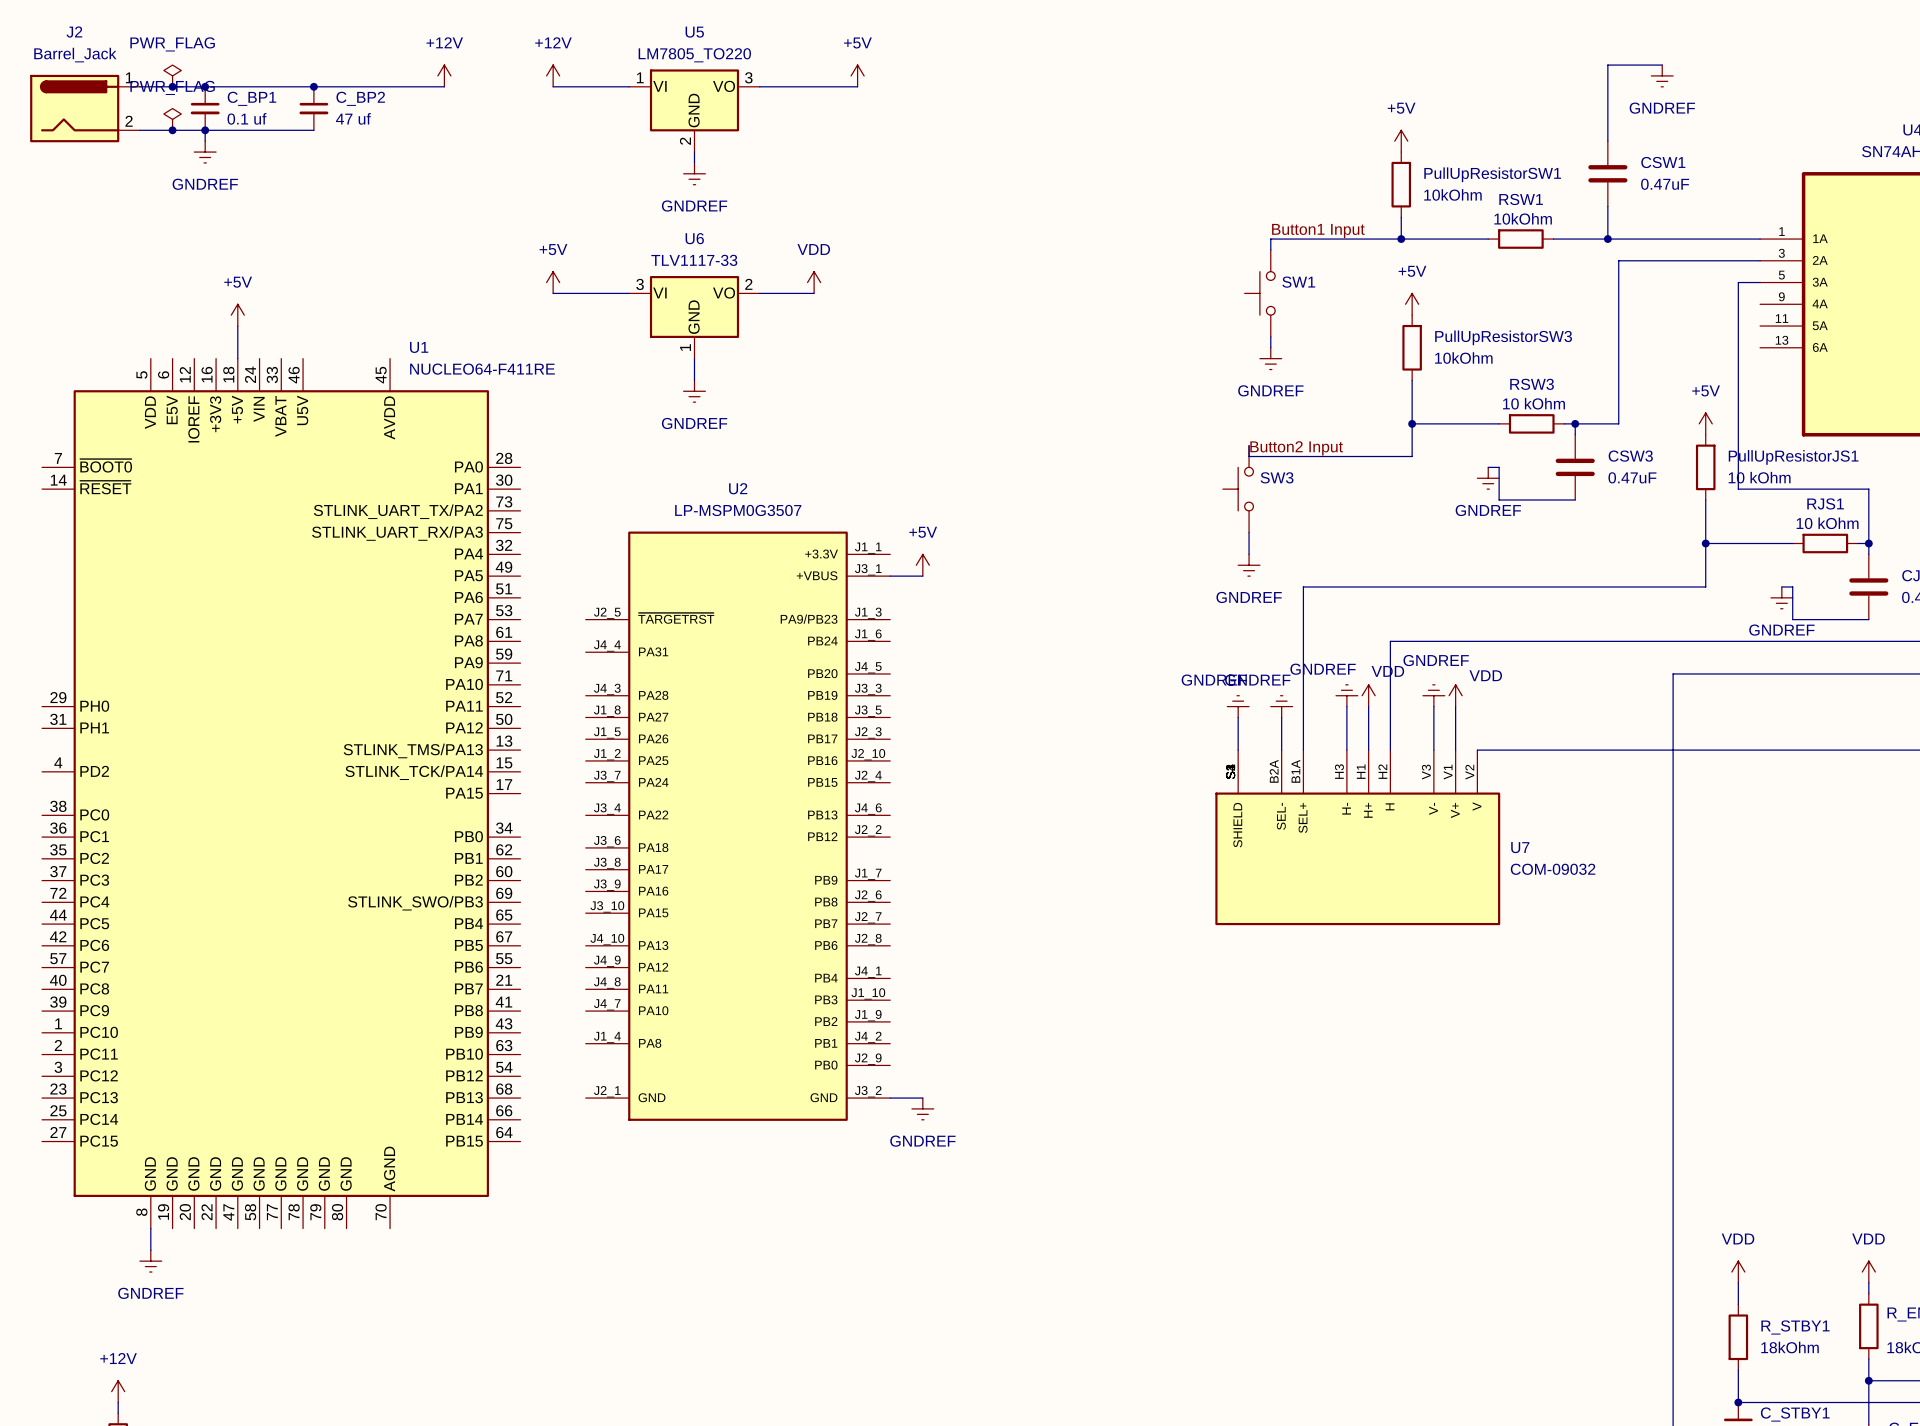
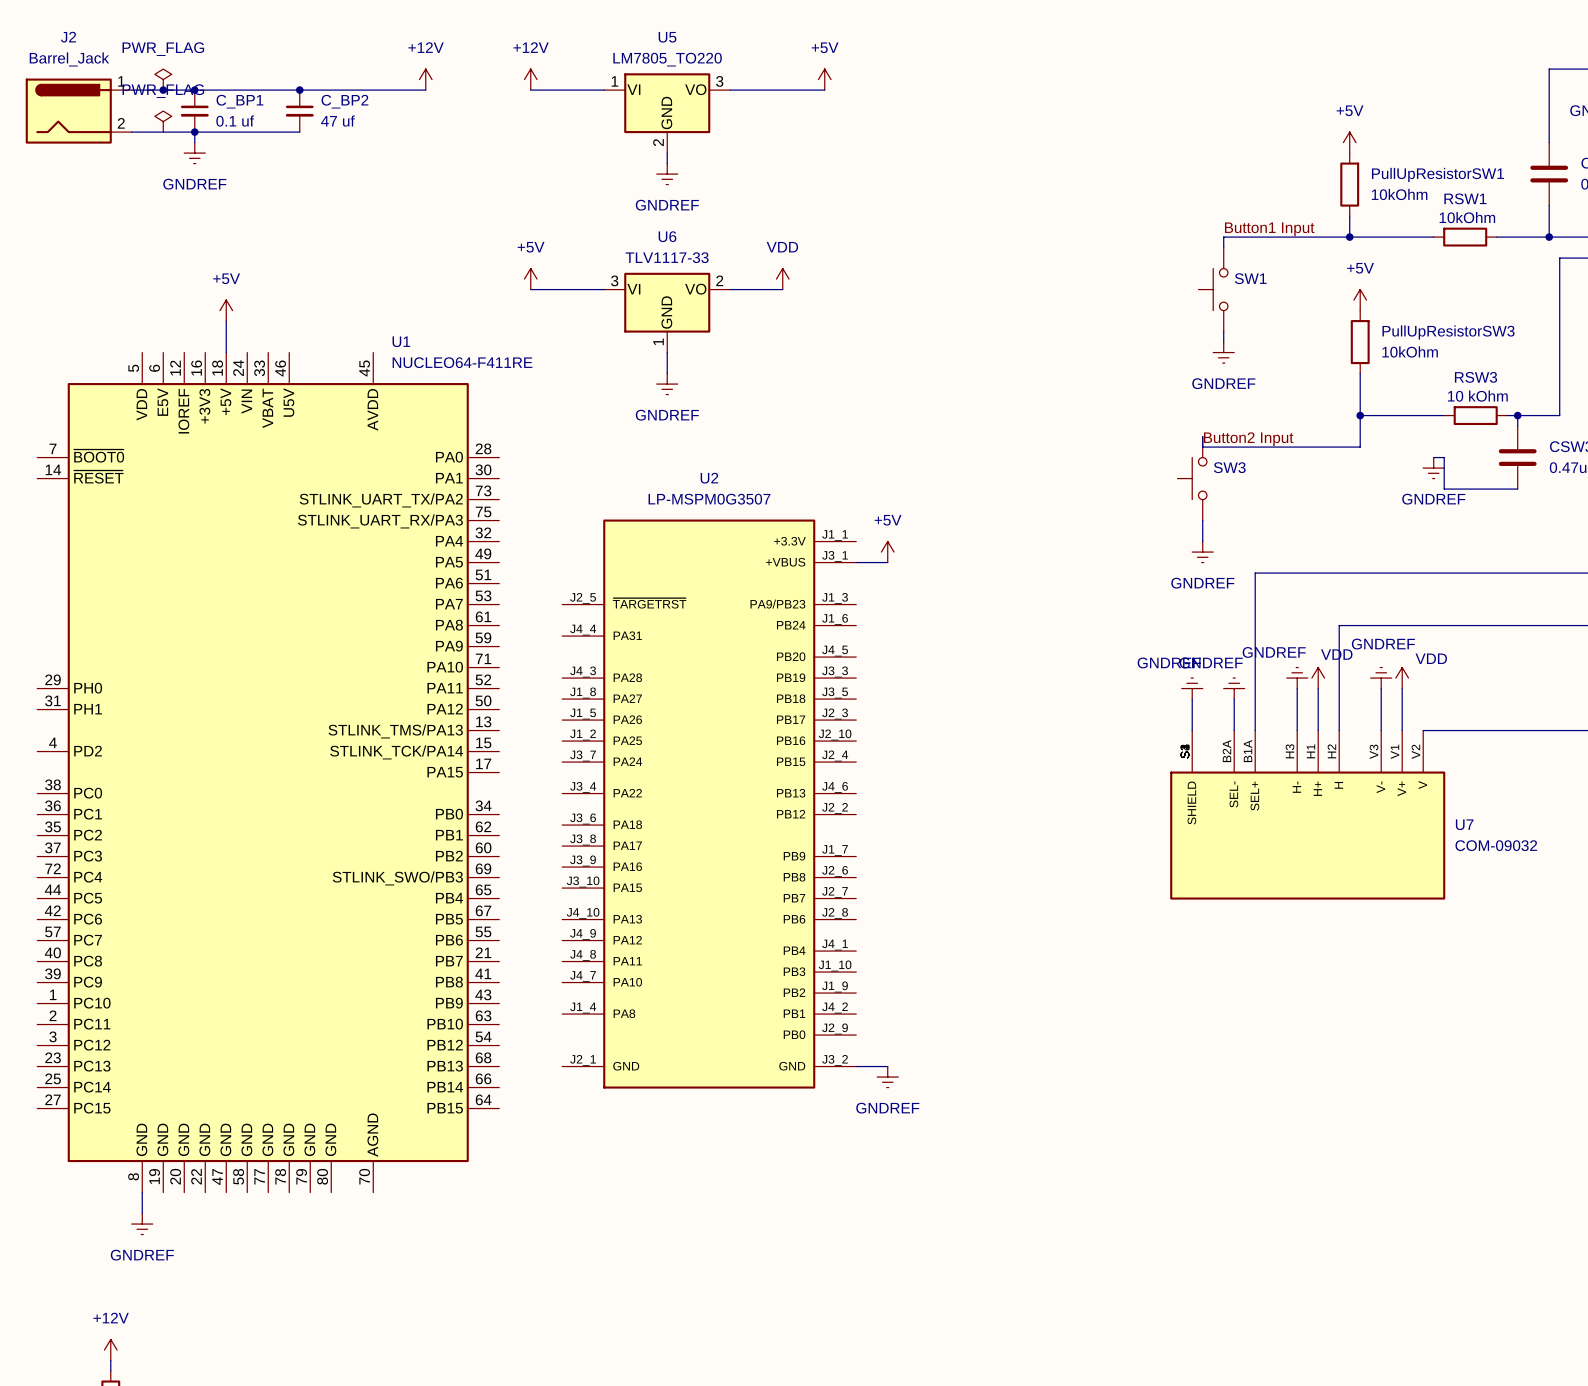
junction: (172, 130) -> none

